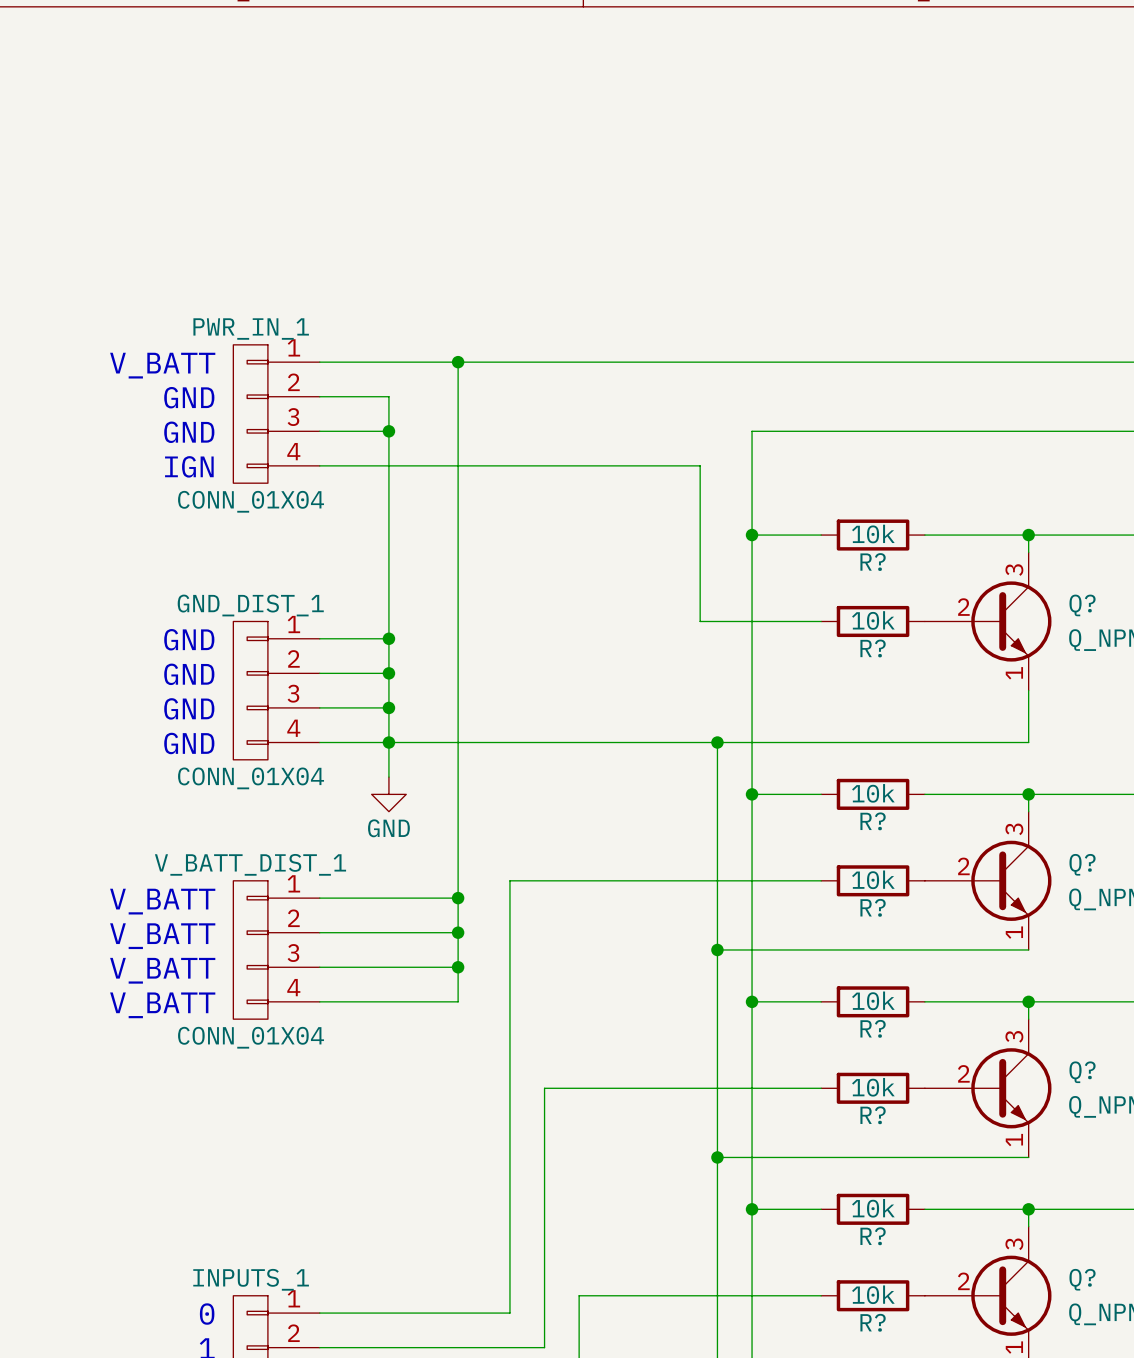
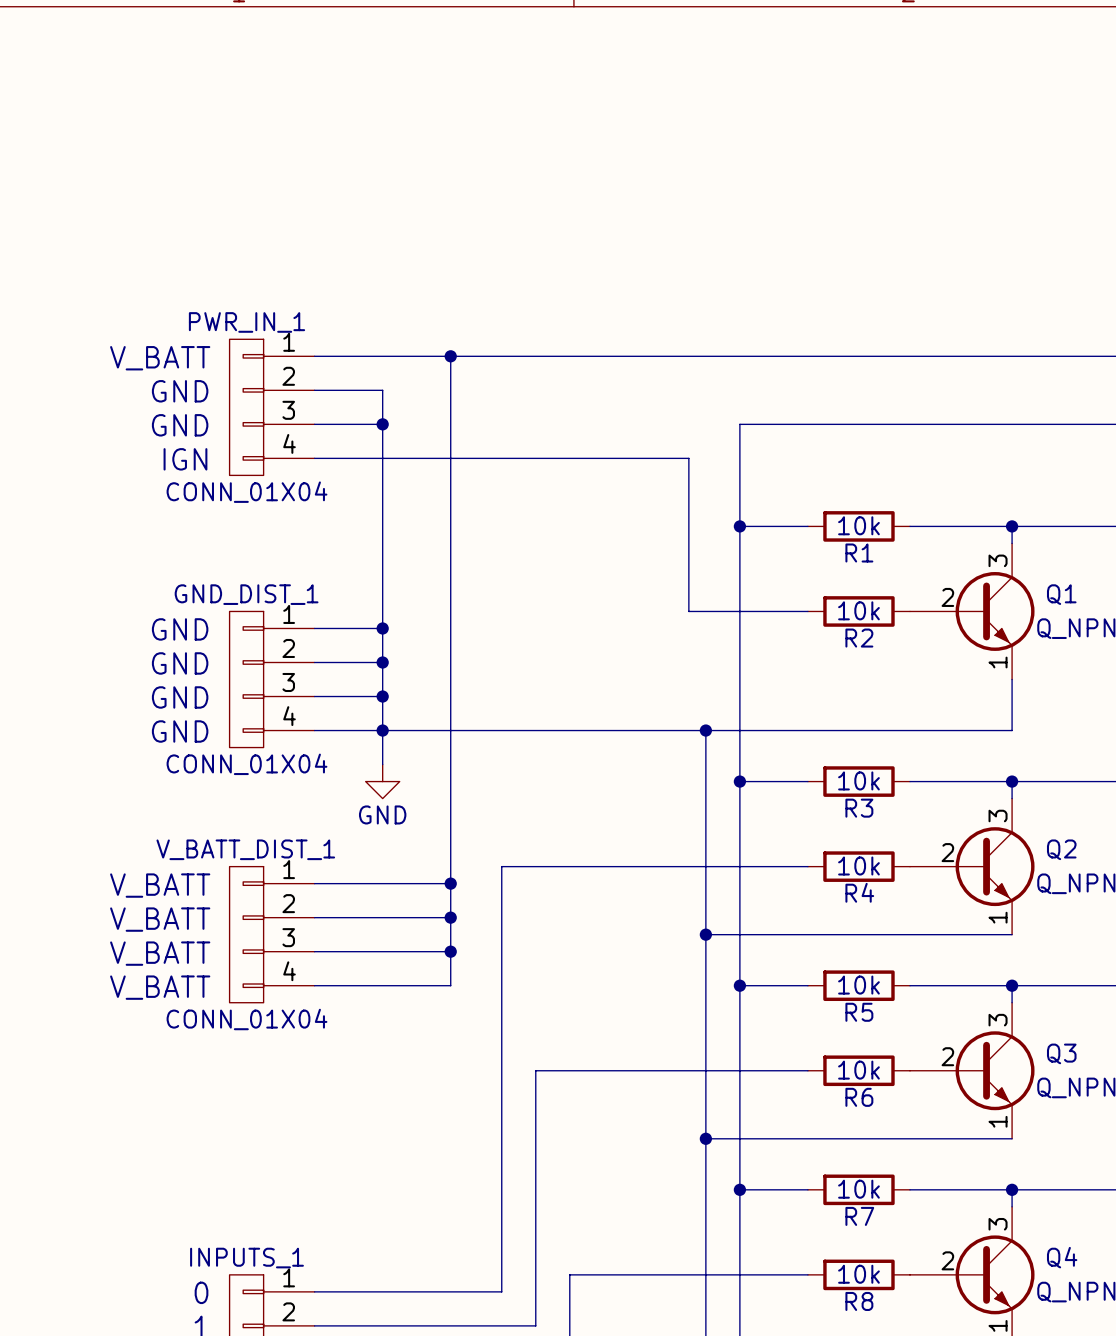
R? name: R? (873, 562) -> R1 (859, 552)
Q? name: Q? (1082, 605) -> Q1 (1061, 594)
R? name: R? (873, 648) -> R2 (859, 638)
R? name: R? (873, 821) -> R3 (859, 808)
Q? name: Q? (1082, 864) -> Q2 (1061, 849)
R? name: R? (873, 907) -> R4 (859, 892)
R? name: R? (873, 1028) -> R5 (859, 1012)
Q? name: Q? (1082, 1072) -> Q3 (1061, 1053)
R? name: R? (873, 1115) -> R6 (859, 1097)
R? name: R? (873, 1236) -> R7 (859, 1216)
Q? name: Q? (1082, 1279) -> Q4 (1062, 1257)
R? name: R? (873, 1322) -> R8 (859, 1301)

